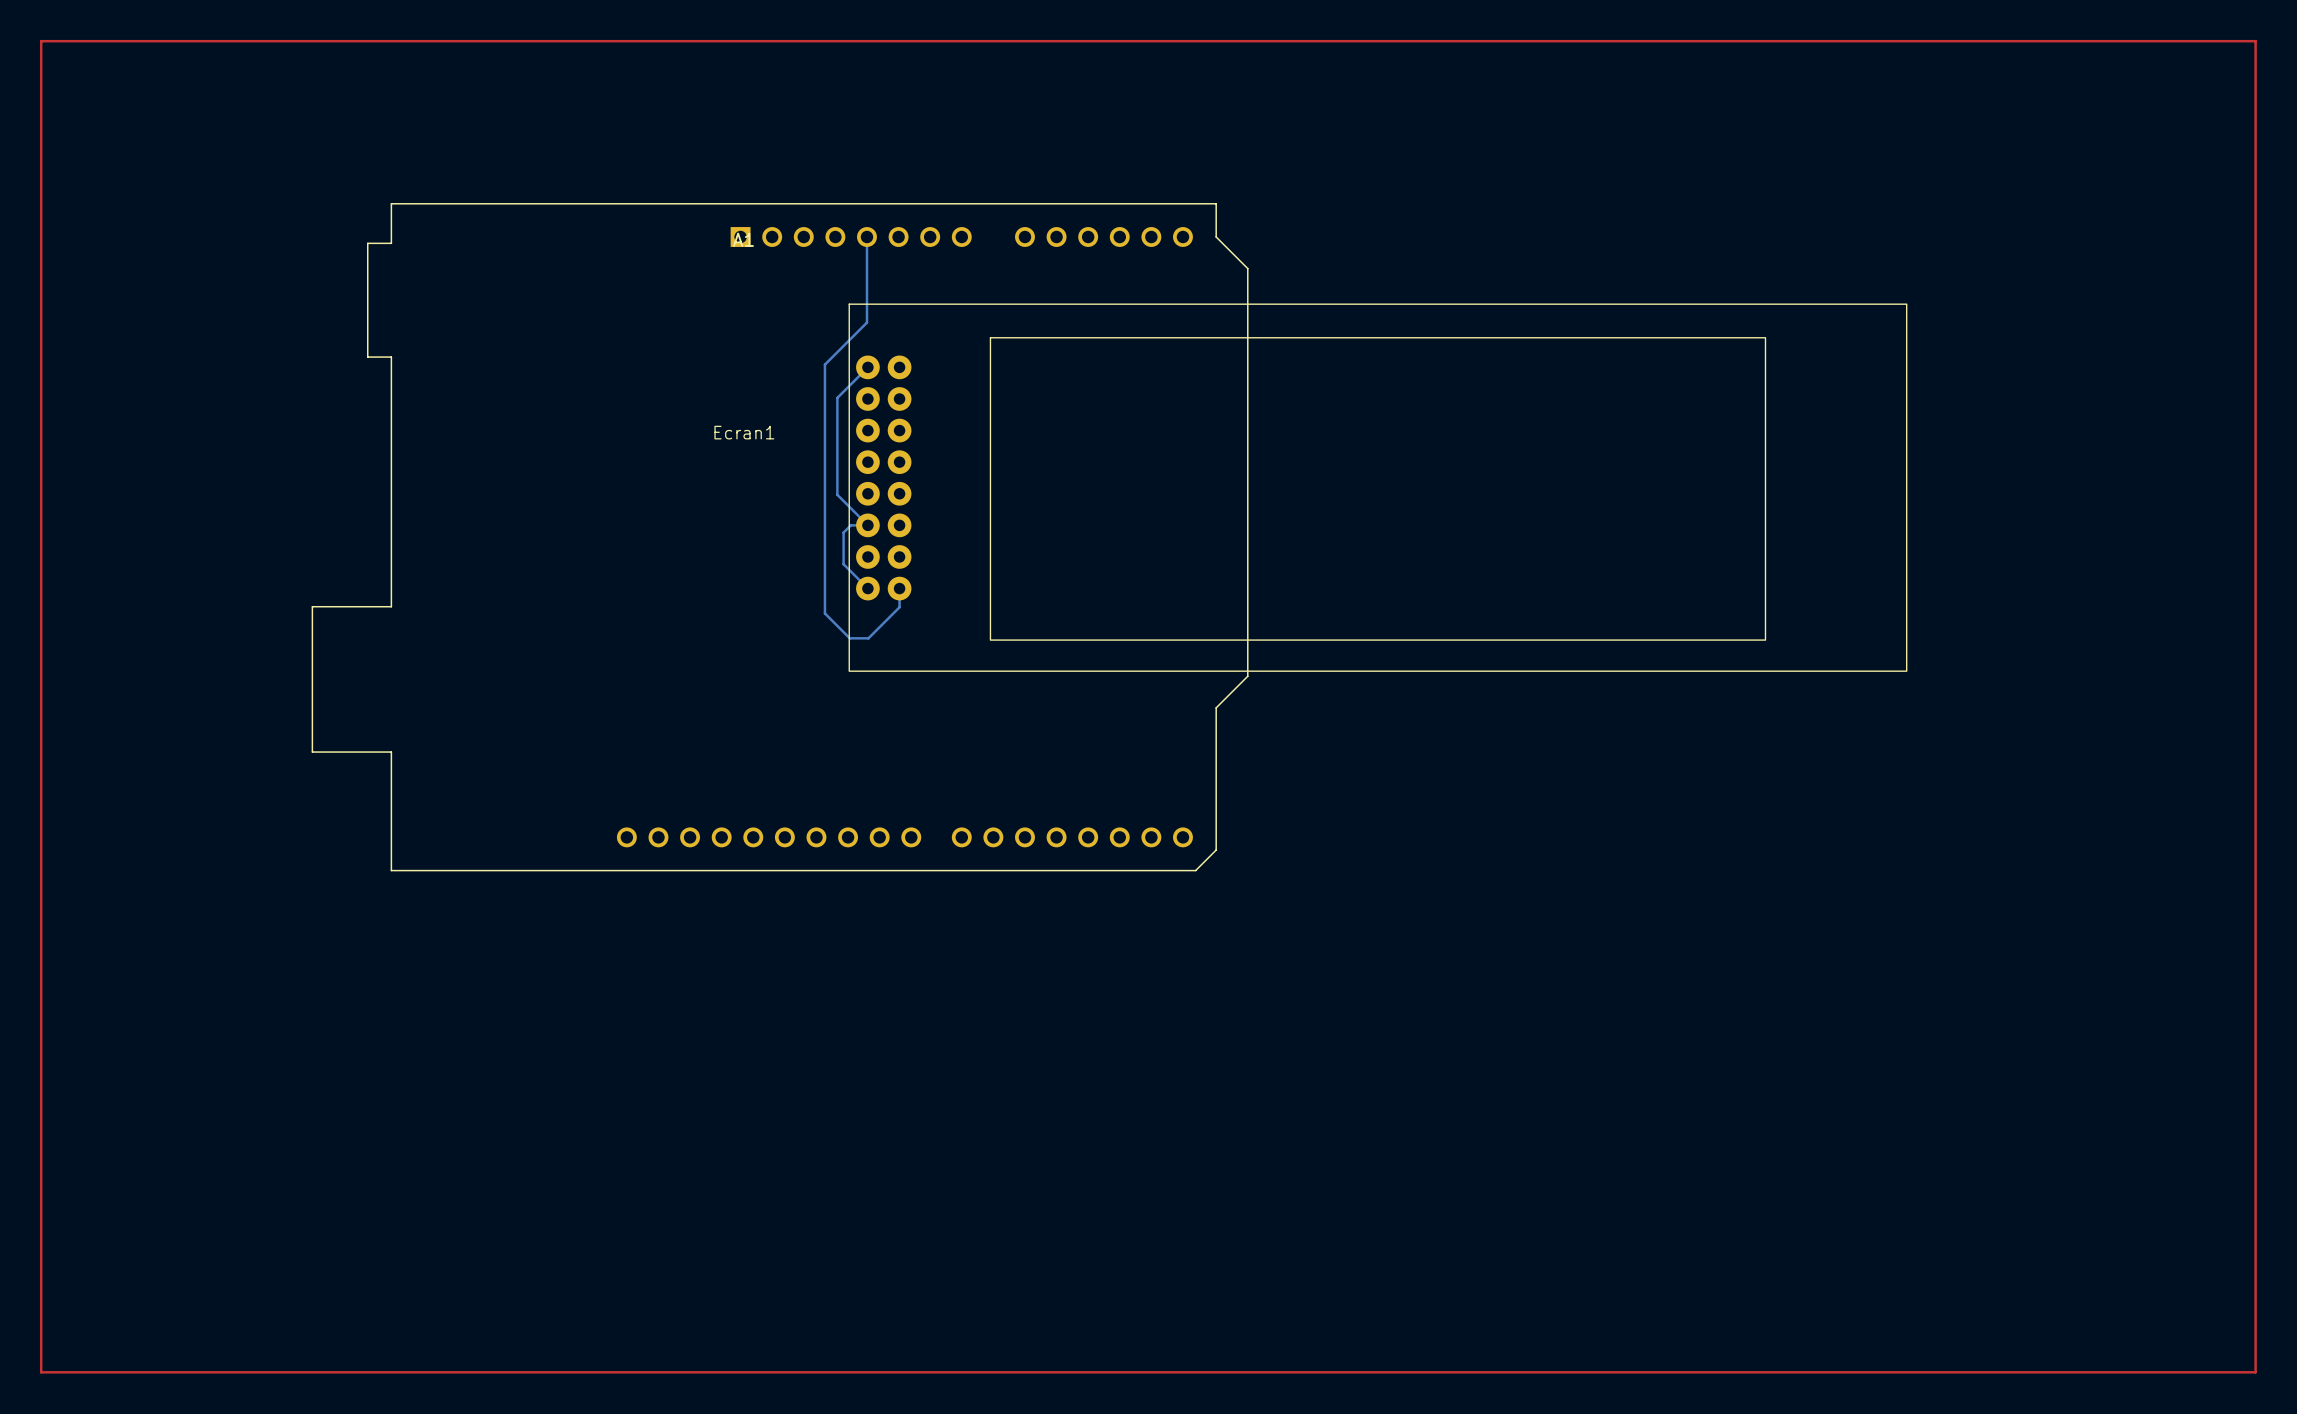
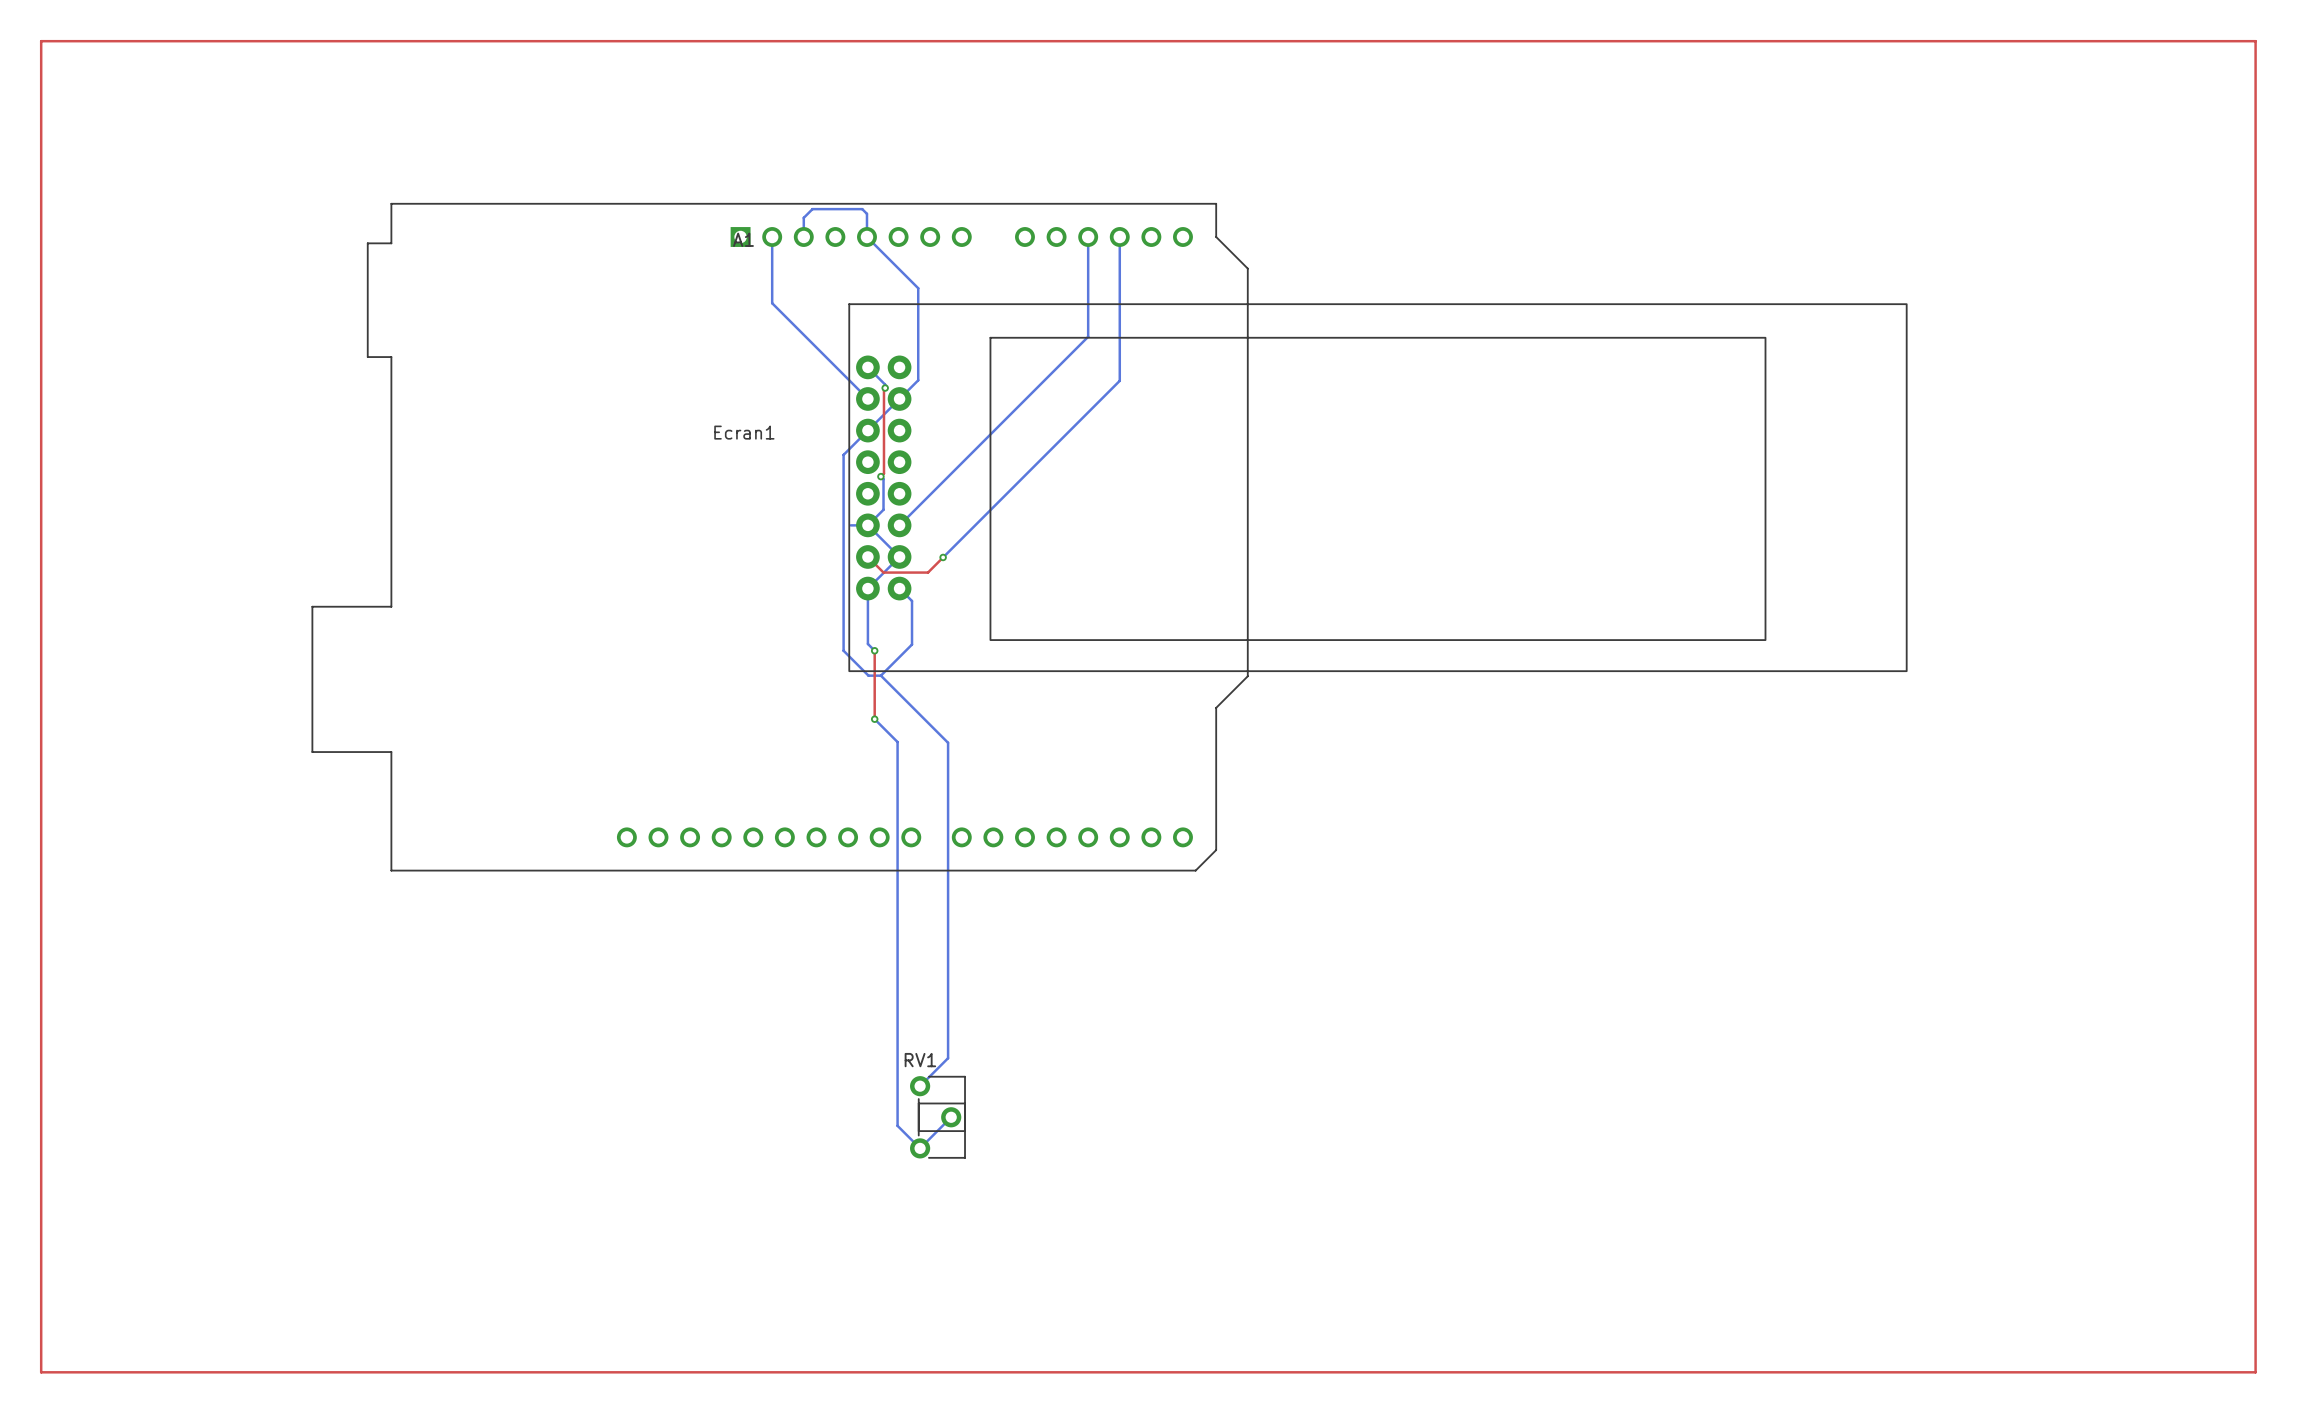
bottom track: none -> (772, 237) (772, 303) (867, 398)
bottom track: (866, 237) (866, 322) (824, 364) (824, 613) (849, 638) (868, 638) (899, 607) (899, 588) -> (880, 675) (912, 644) (912, 601) (899, 588)
bottom track: none -> (1088, 237) (1088, 336) (899, 525)
bottom track: none -> (1119, 237) (1119, 380) (943, 557)
bottom track: (867, 367) (837, 397) (837, 494) (867, 525) -> (867, 367) (885, 384) (885, 388)
top track: none -> (885, 388) (883, 473) (880, 476)
via: none -> (885, 388)
bottom track: none -> (880, 476) (883, 479) (883, 509) (867, 525) (899, 556) (867, 588) (867, 643) (874, 650)
via: none -> (880, 476)
bottom track: (850, 525) (843, 532) -> (803, 237) (803, 217) (812, 209) (862, 209) (866, 213) (866, 237) (918, 288) (918, 380) (843, 454) (843, 532)
top track: none -> (867, 556) (883, 572) (928, 572) (943, 557)
via: none -> (943, 557)
bottom track: (843, 564) (867, 588) -> (843, 564) (843, 650) (868, 675) (880, 675)
top track: none -> (874, 650) (874, 719)
via: none -> (874, 650)
bottom track: none -> (880, 675) (948, 742) (948, 1058) (920, 1086)
bottom track: none -> (874, 719) (897, 742) (897, 1125) (920, 1148) (951, 1117)
via: none -> (874, 719)
RV1: none -> (937, 1117)

